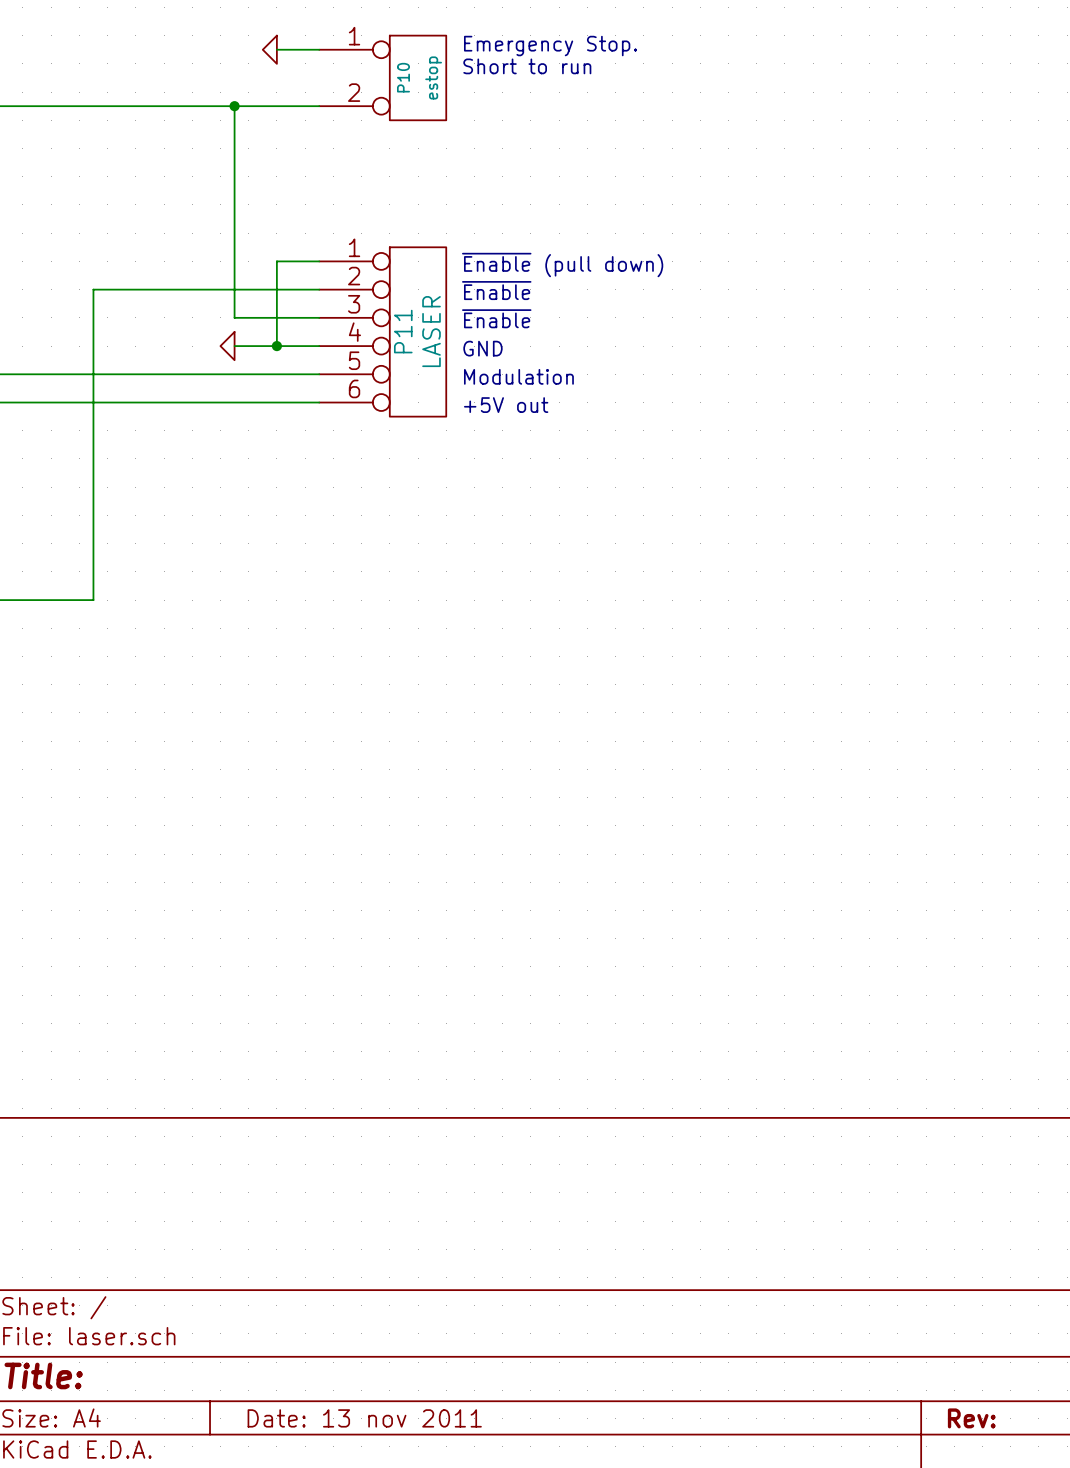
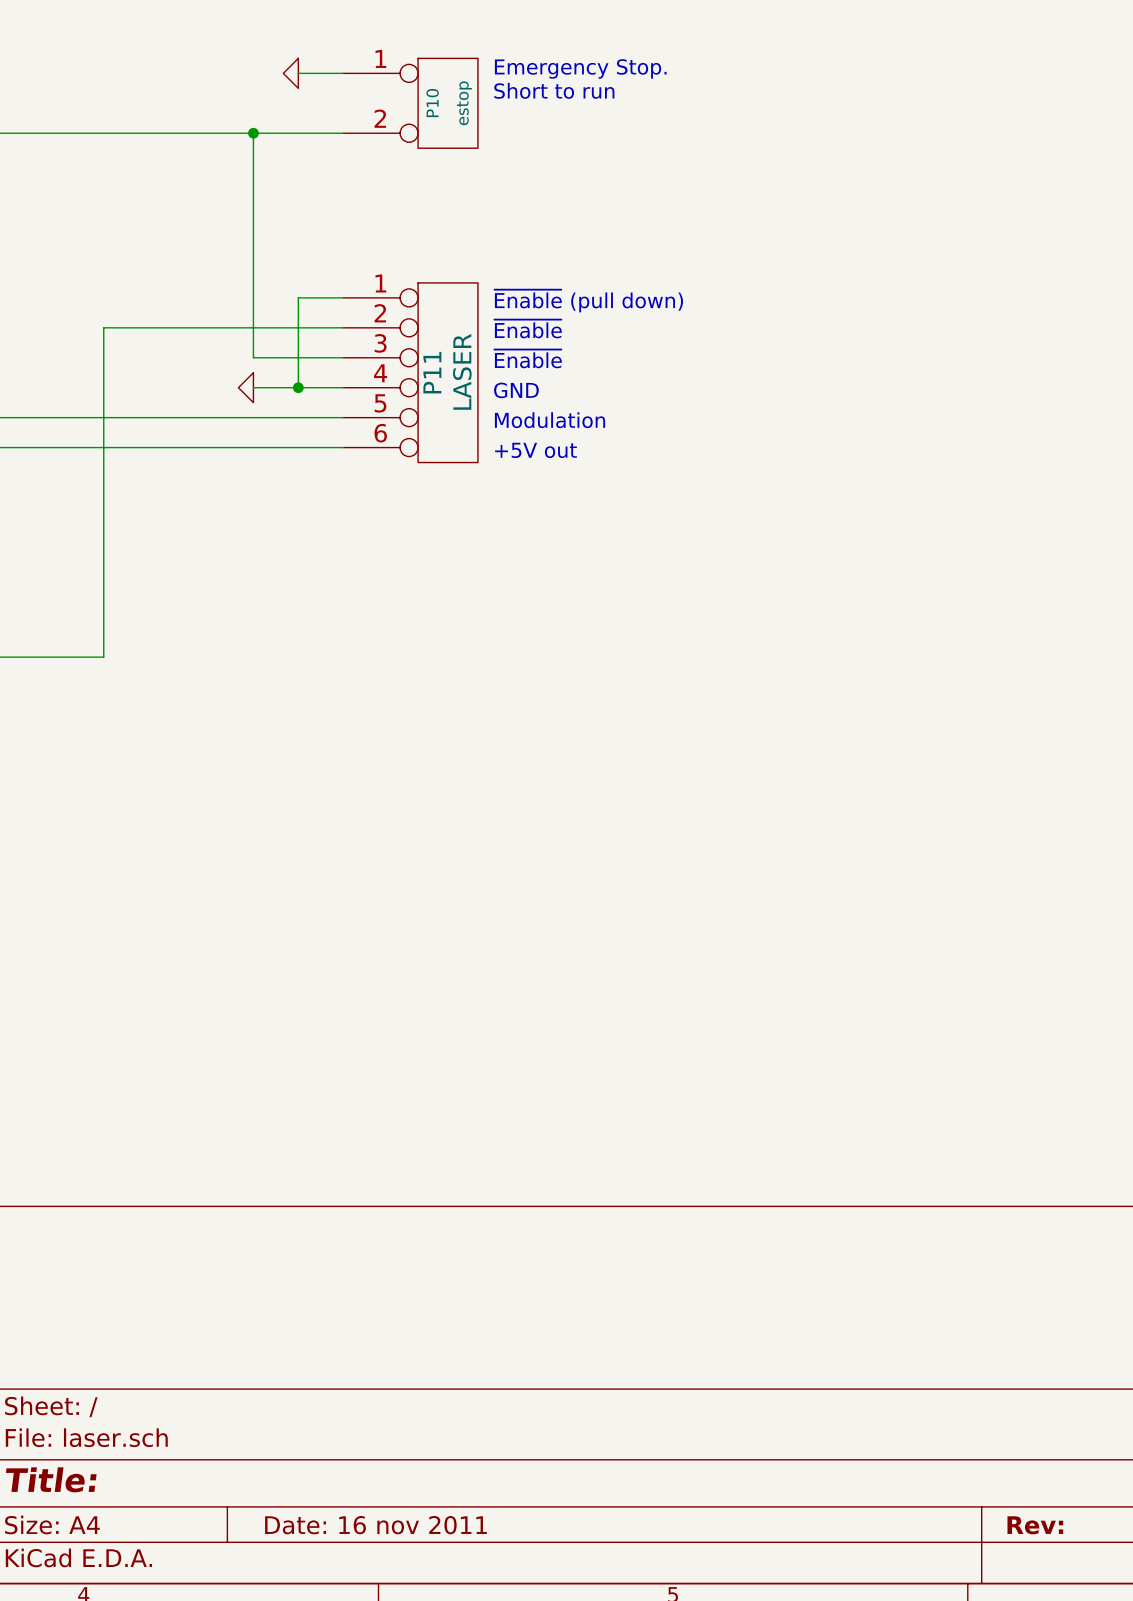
title block: Date: 13 nov 2011 (364, 1418) -> Date: 16 nov 2011 (375, 1525)

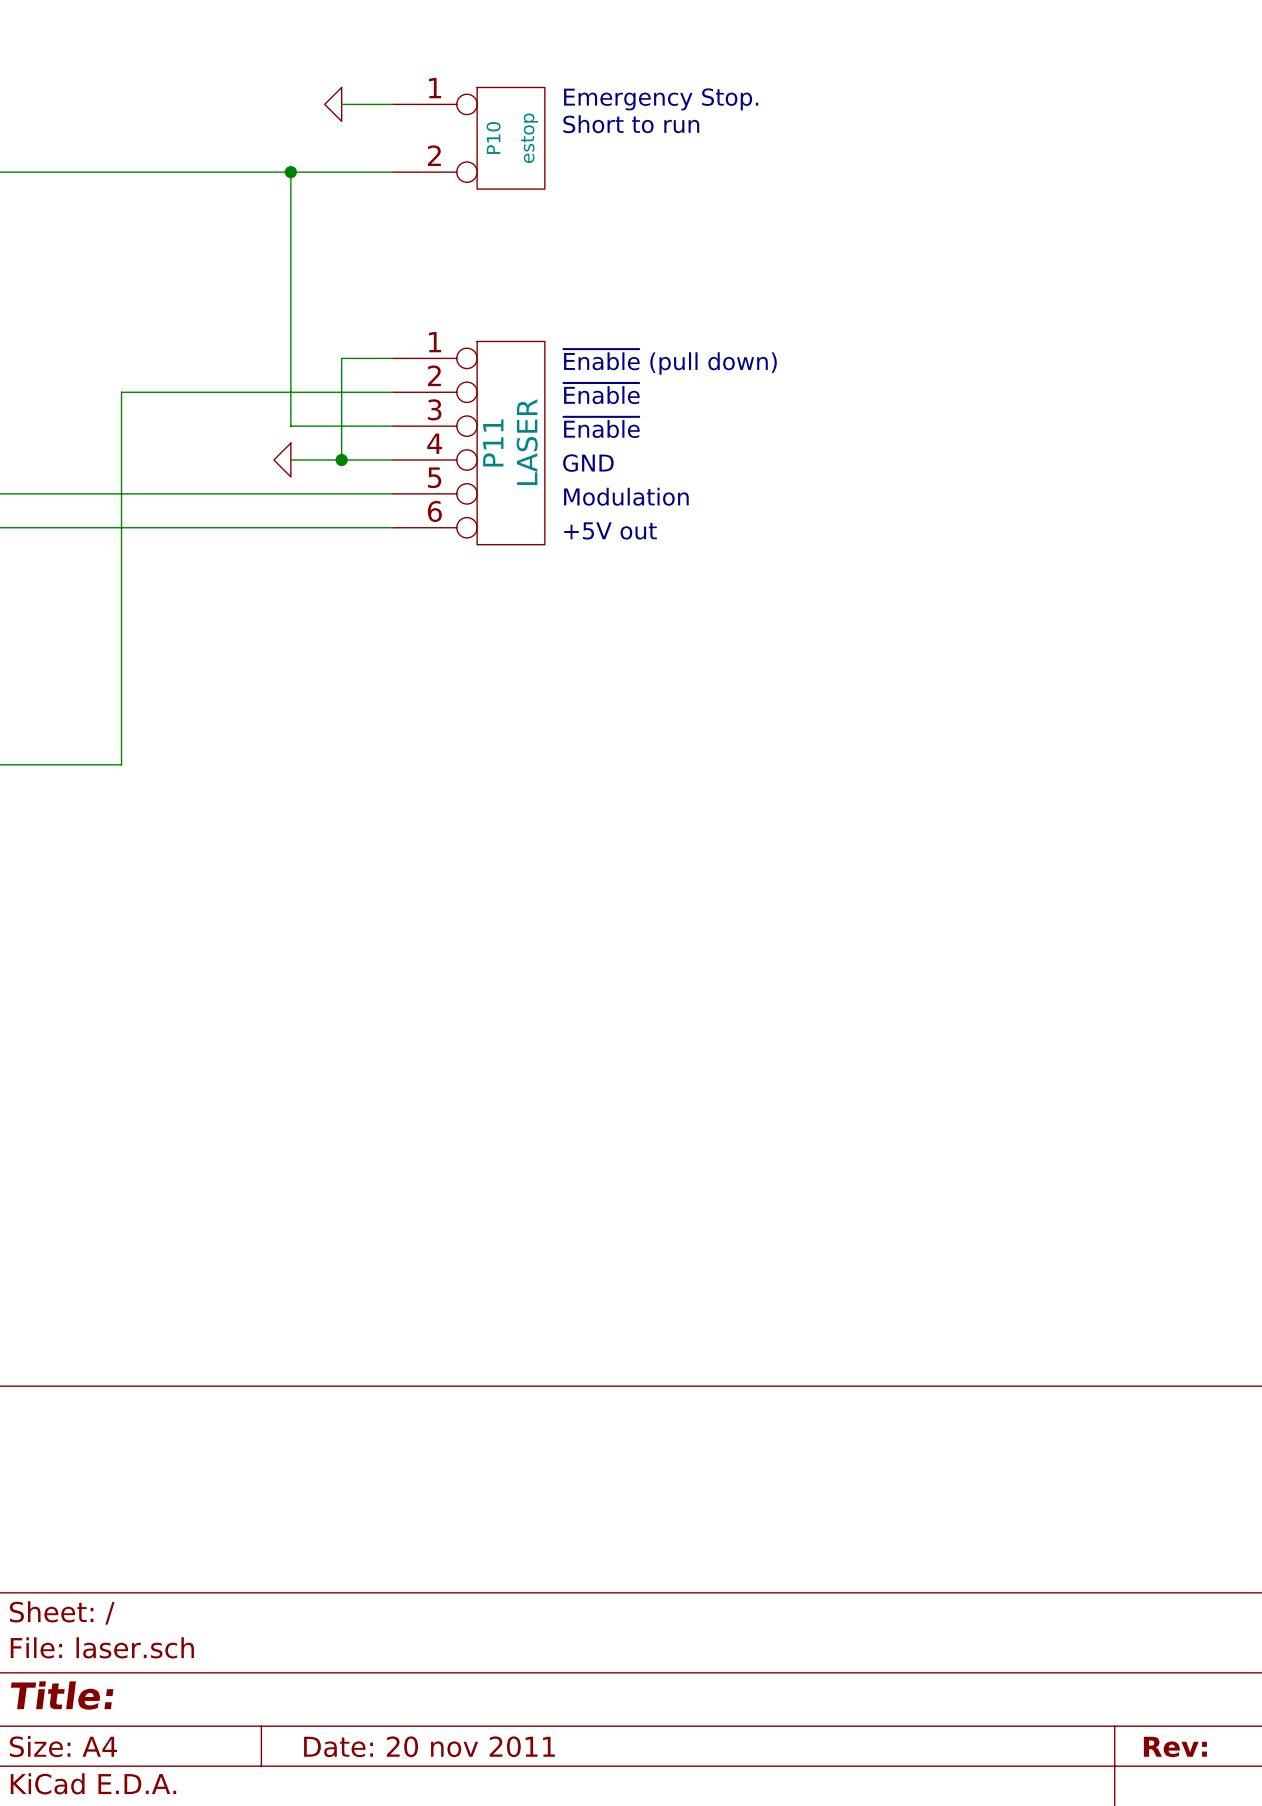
title block: Date: 16 nov 2011 (375, 1525) -> Date: 20 nov 2011 (429, 1746)

